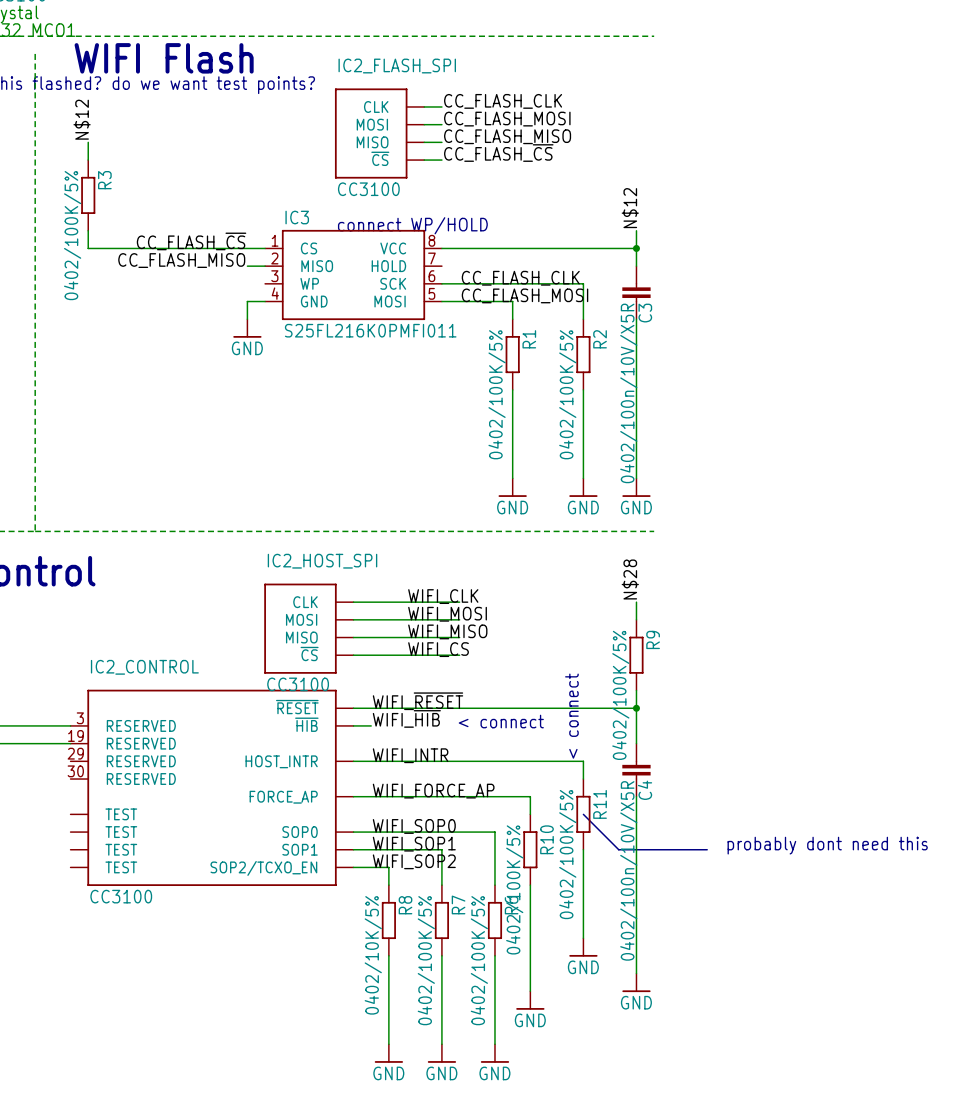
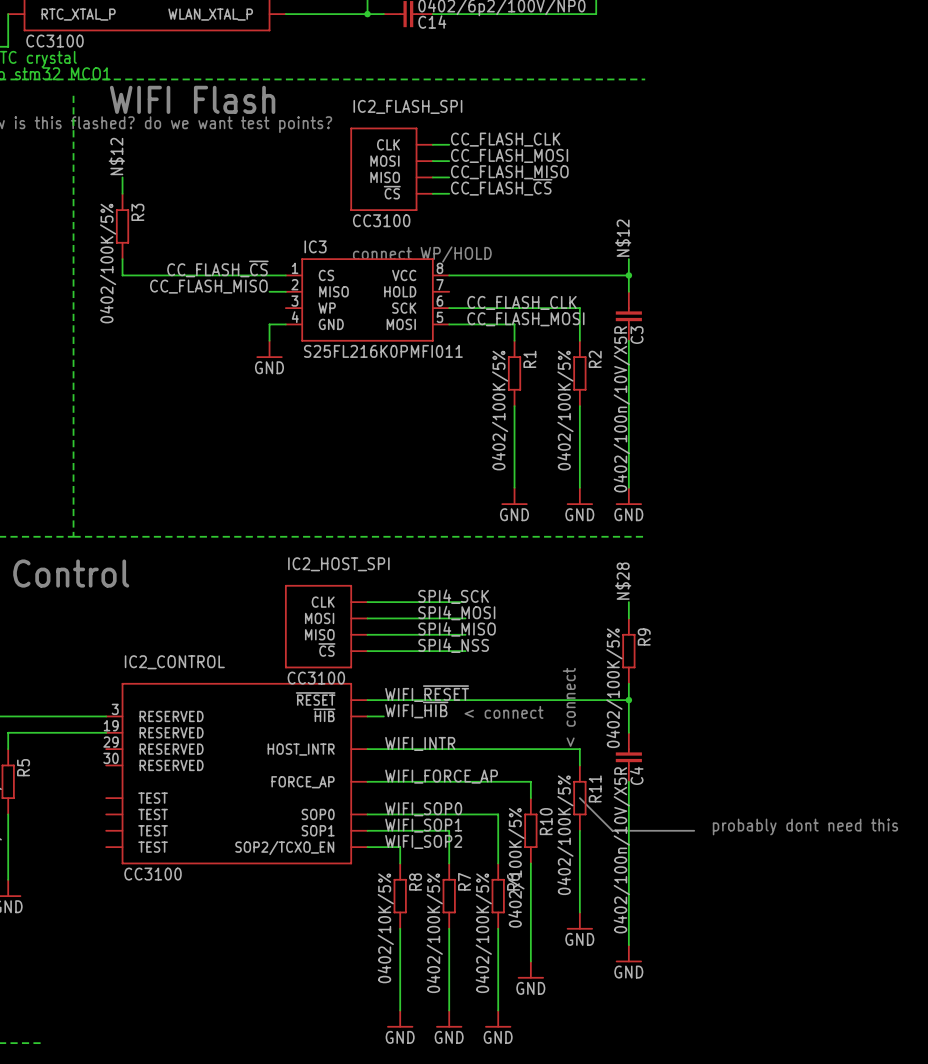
label: WIFI_CLK (443, 596) -> SPI4_SCK (453, 596)
label: WIFI_MOSI (447, 614) -> SPI4_MOSI (456, 613)
label: WIFI_MISO (447, 631) -> SPI4_MISO (457, 629)
label: WIFI_CS (438, 649) -> SPI4_NSS (453, 645)

